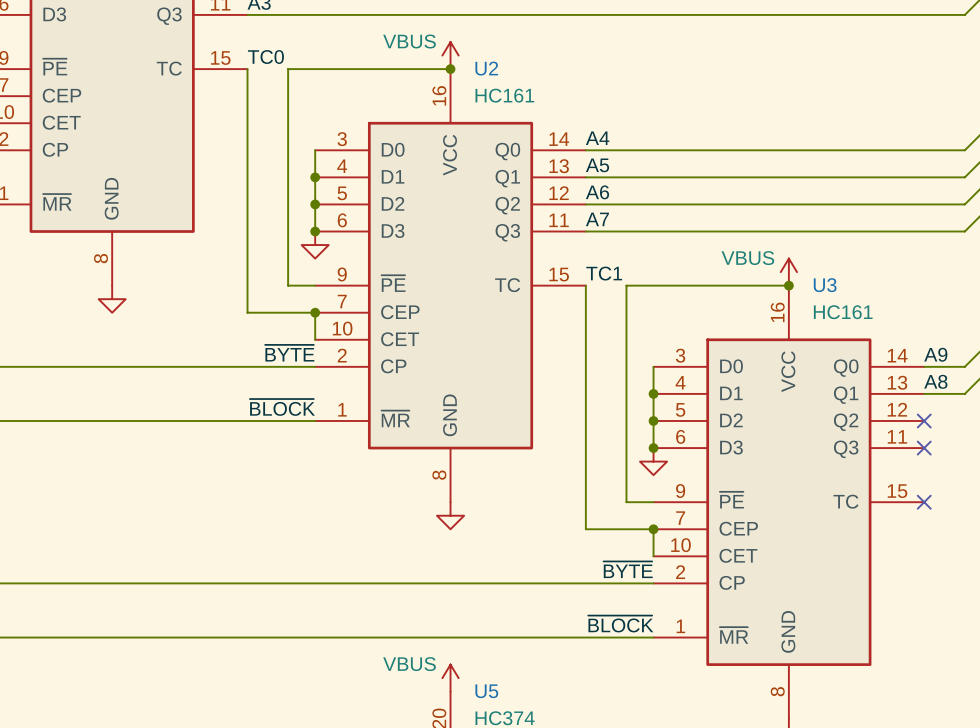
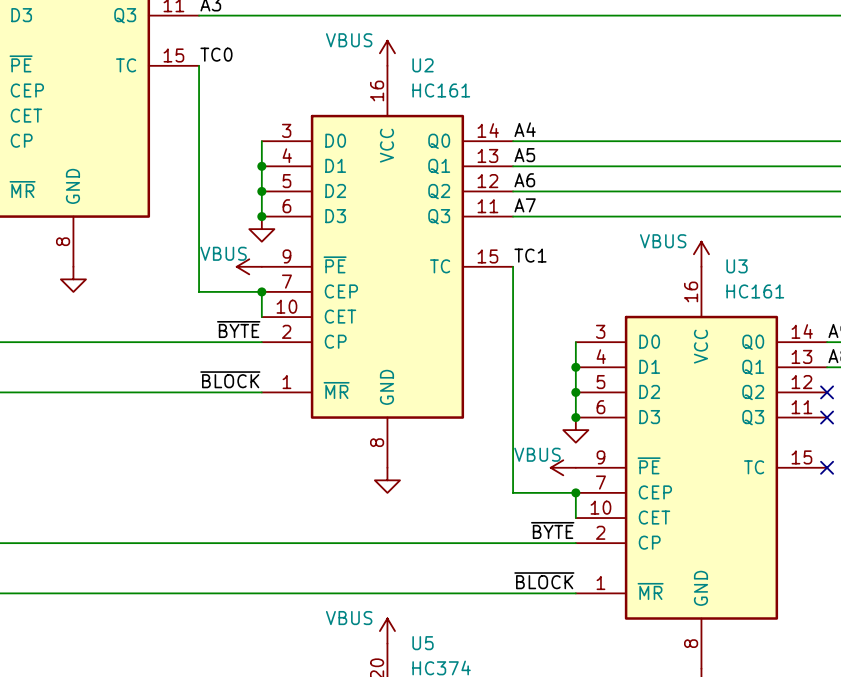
wire: (450, 69) (288, 69) (288, 285) (315, 285) -> none
junction: (450, 69) -> none
power symbol: none -> VBUS (249, 266)
wire: (788, 285) (626, 285) (626, 502) (653, 502) -> none
junction: (788, 285) -> none
power symbol: none -> VBUS (563, 467)

